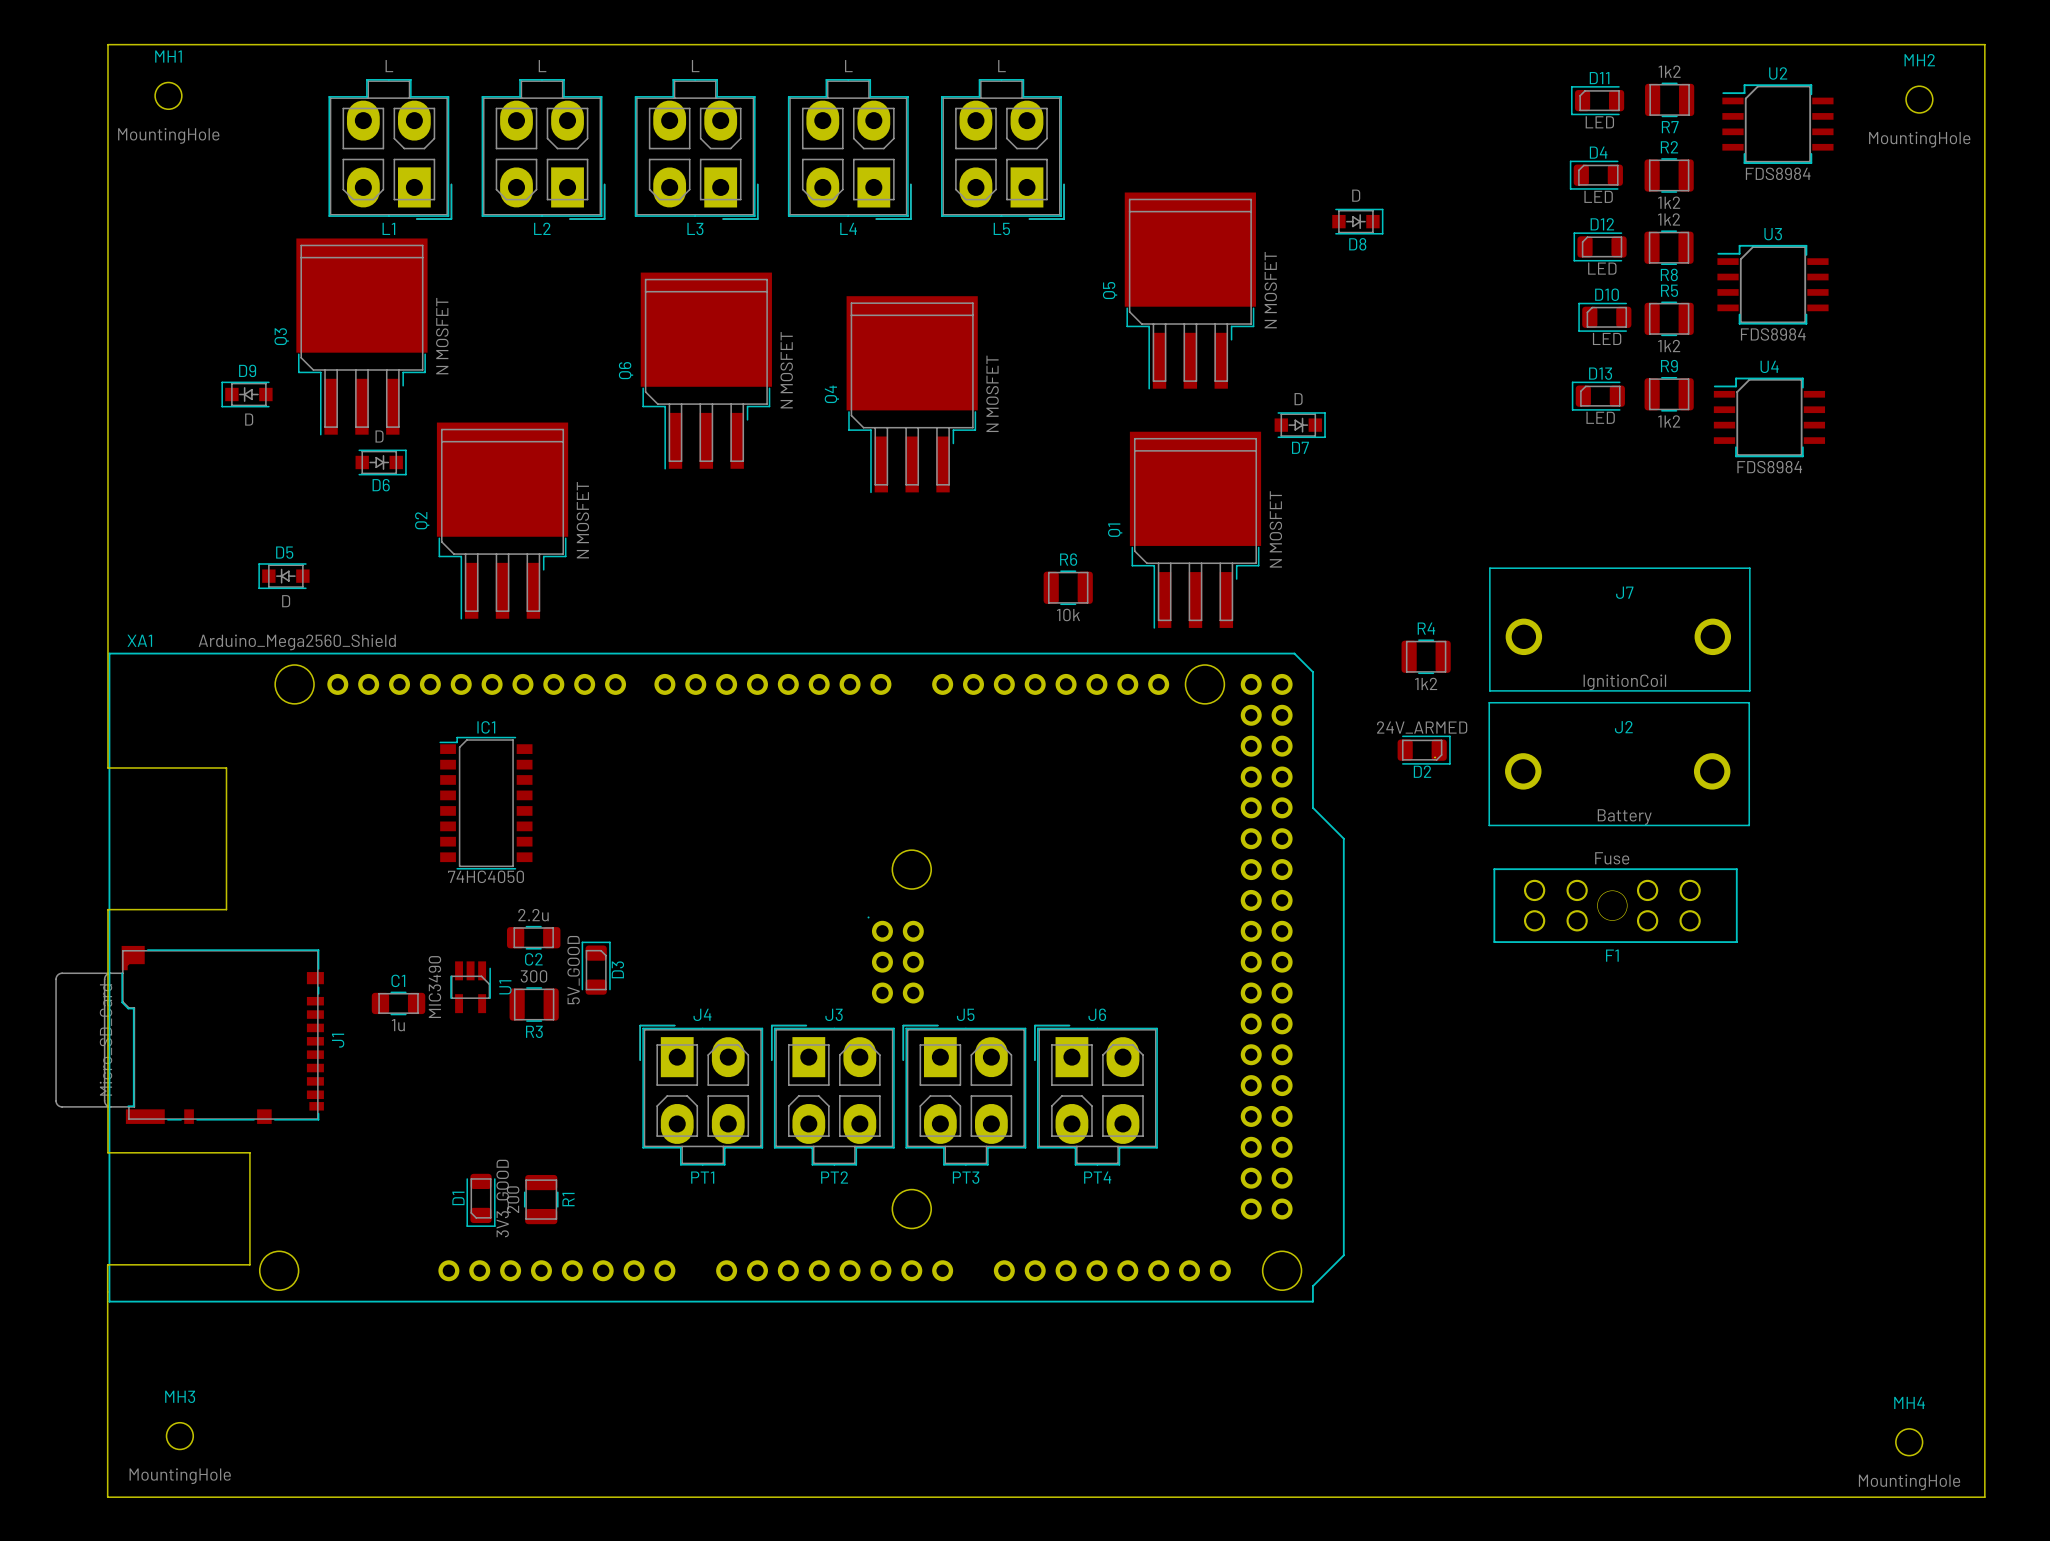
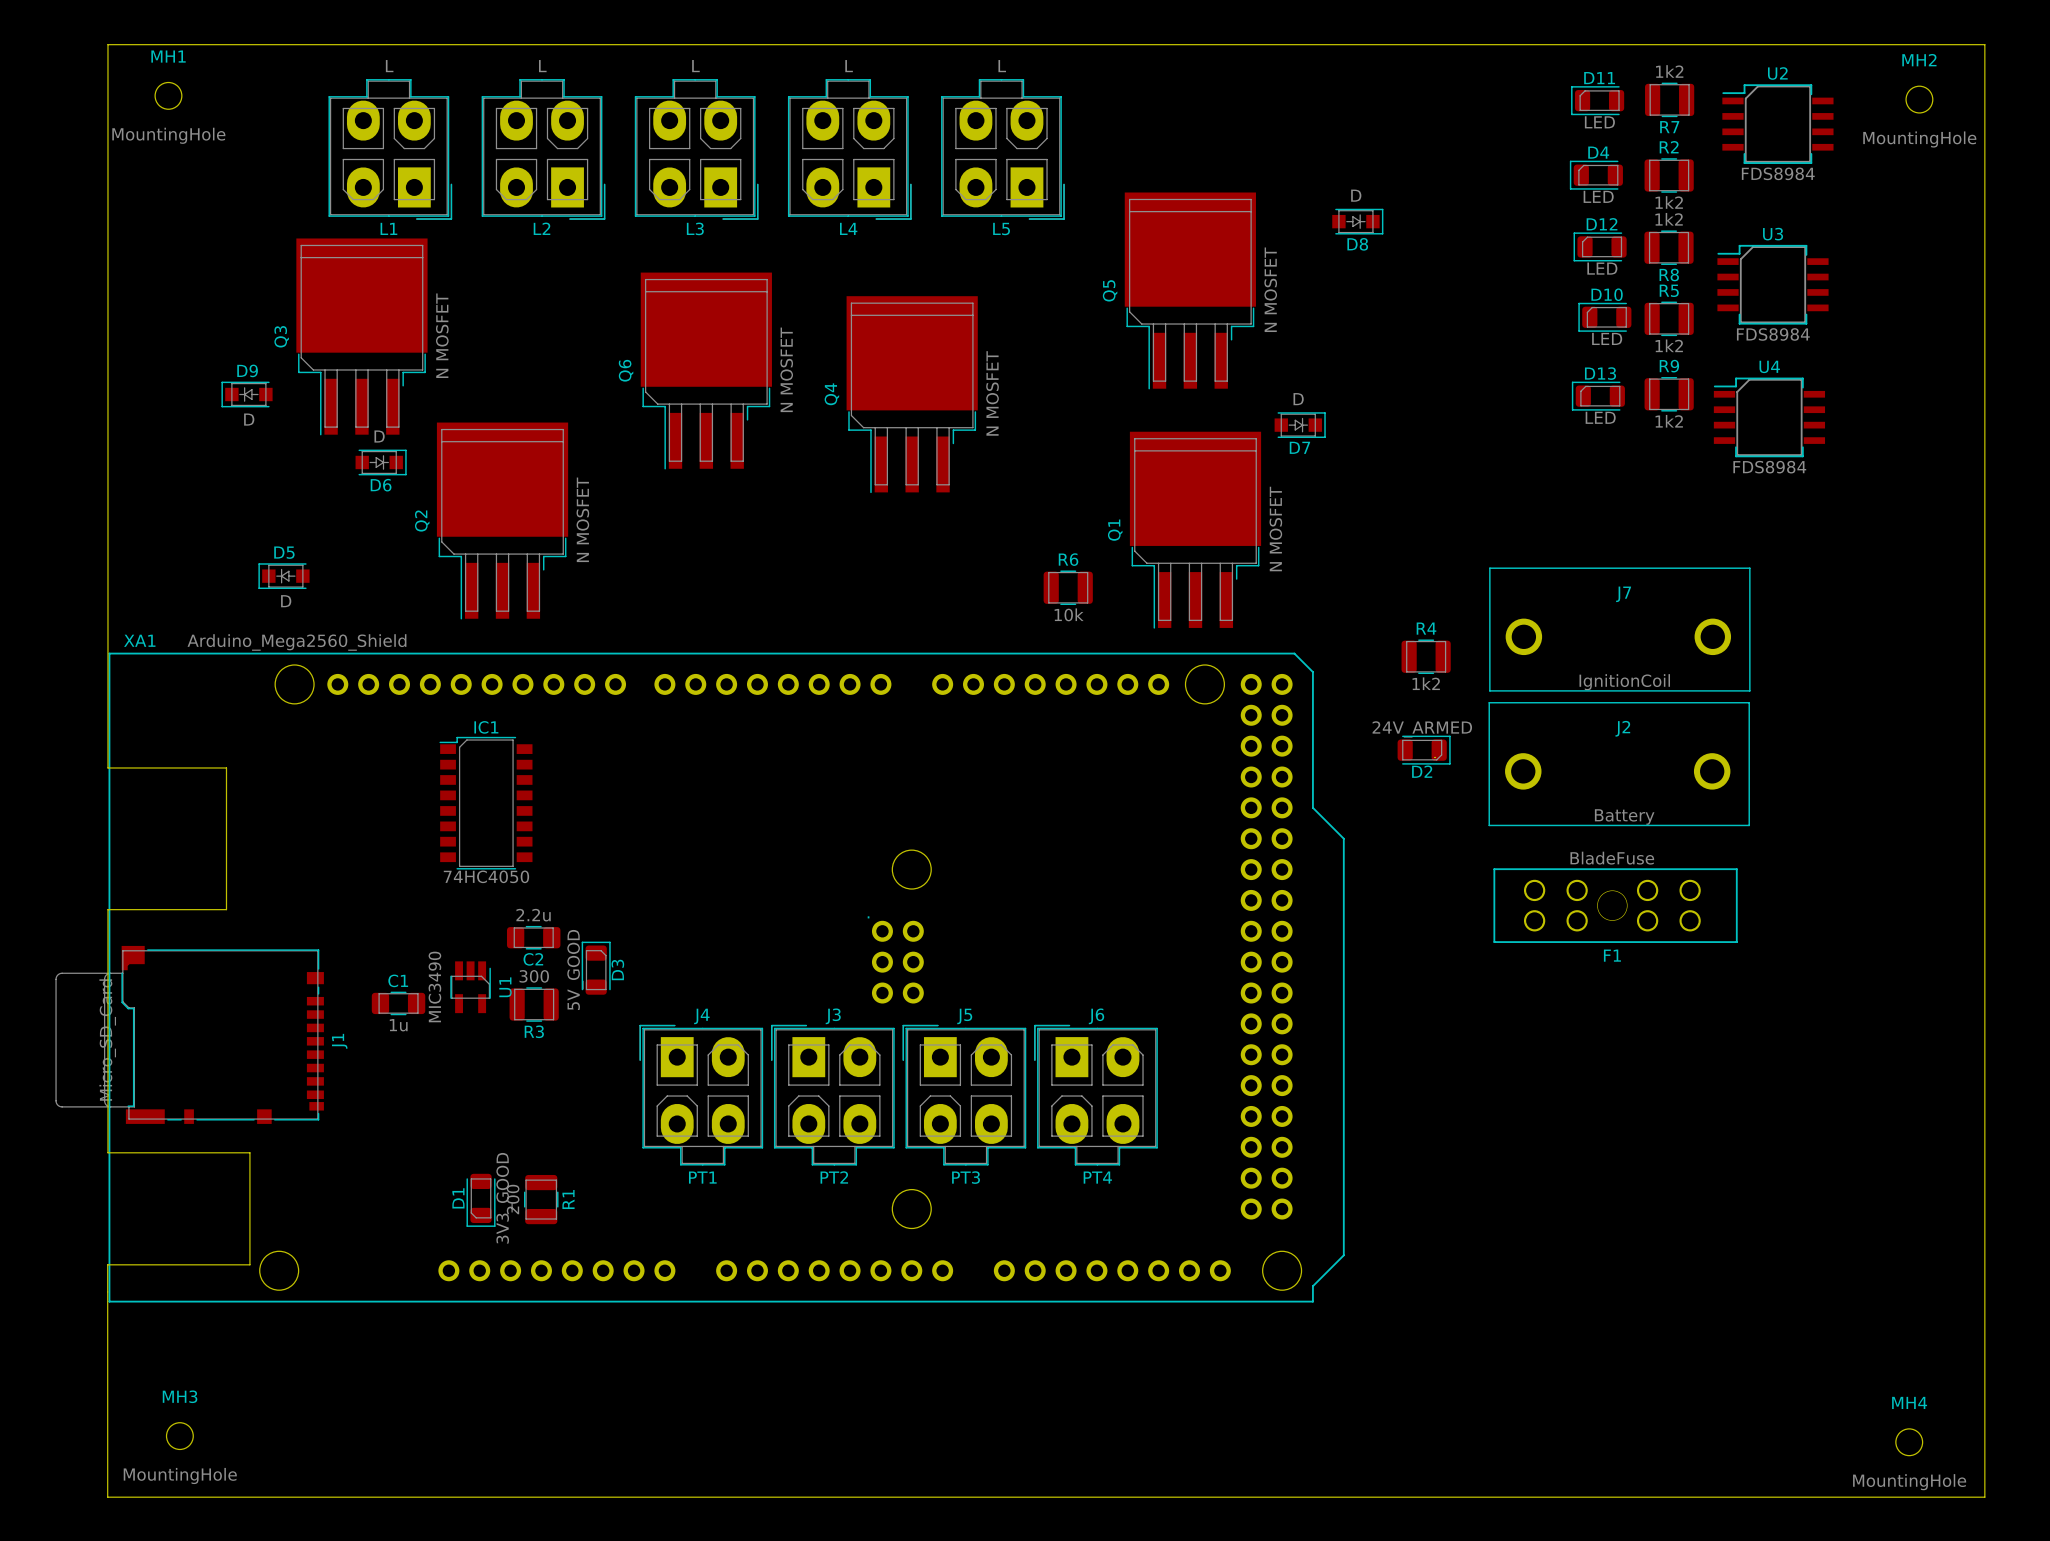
F1 value: Fuse (1612, 858) -> BladeFuse (1612, 858)

